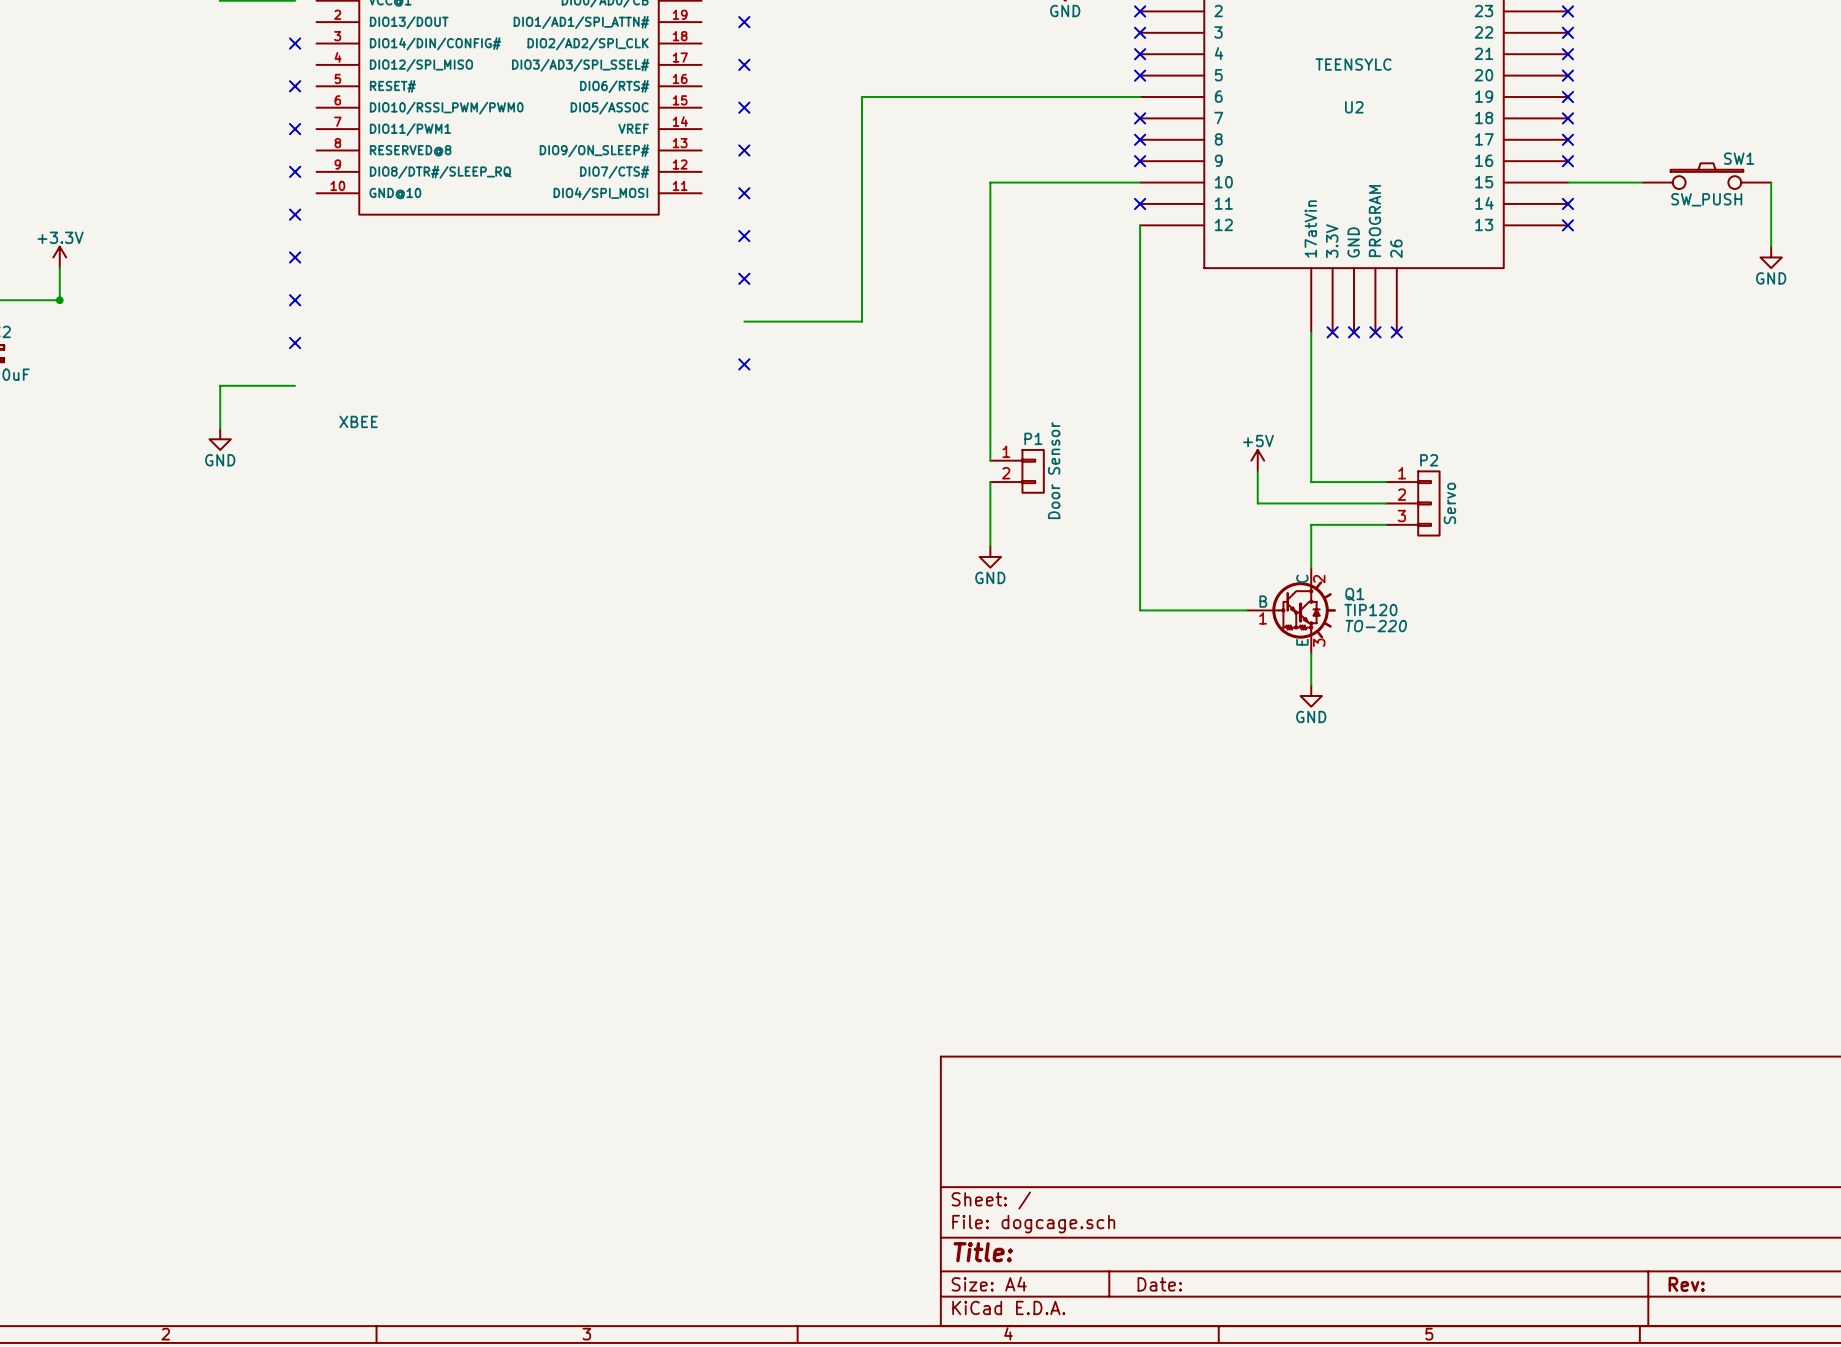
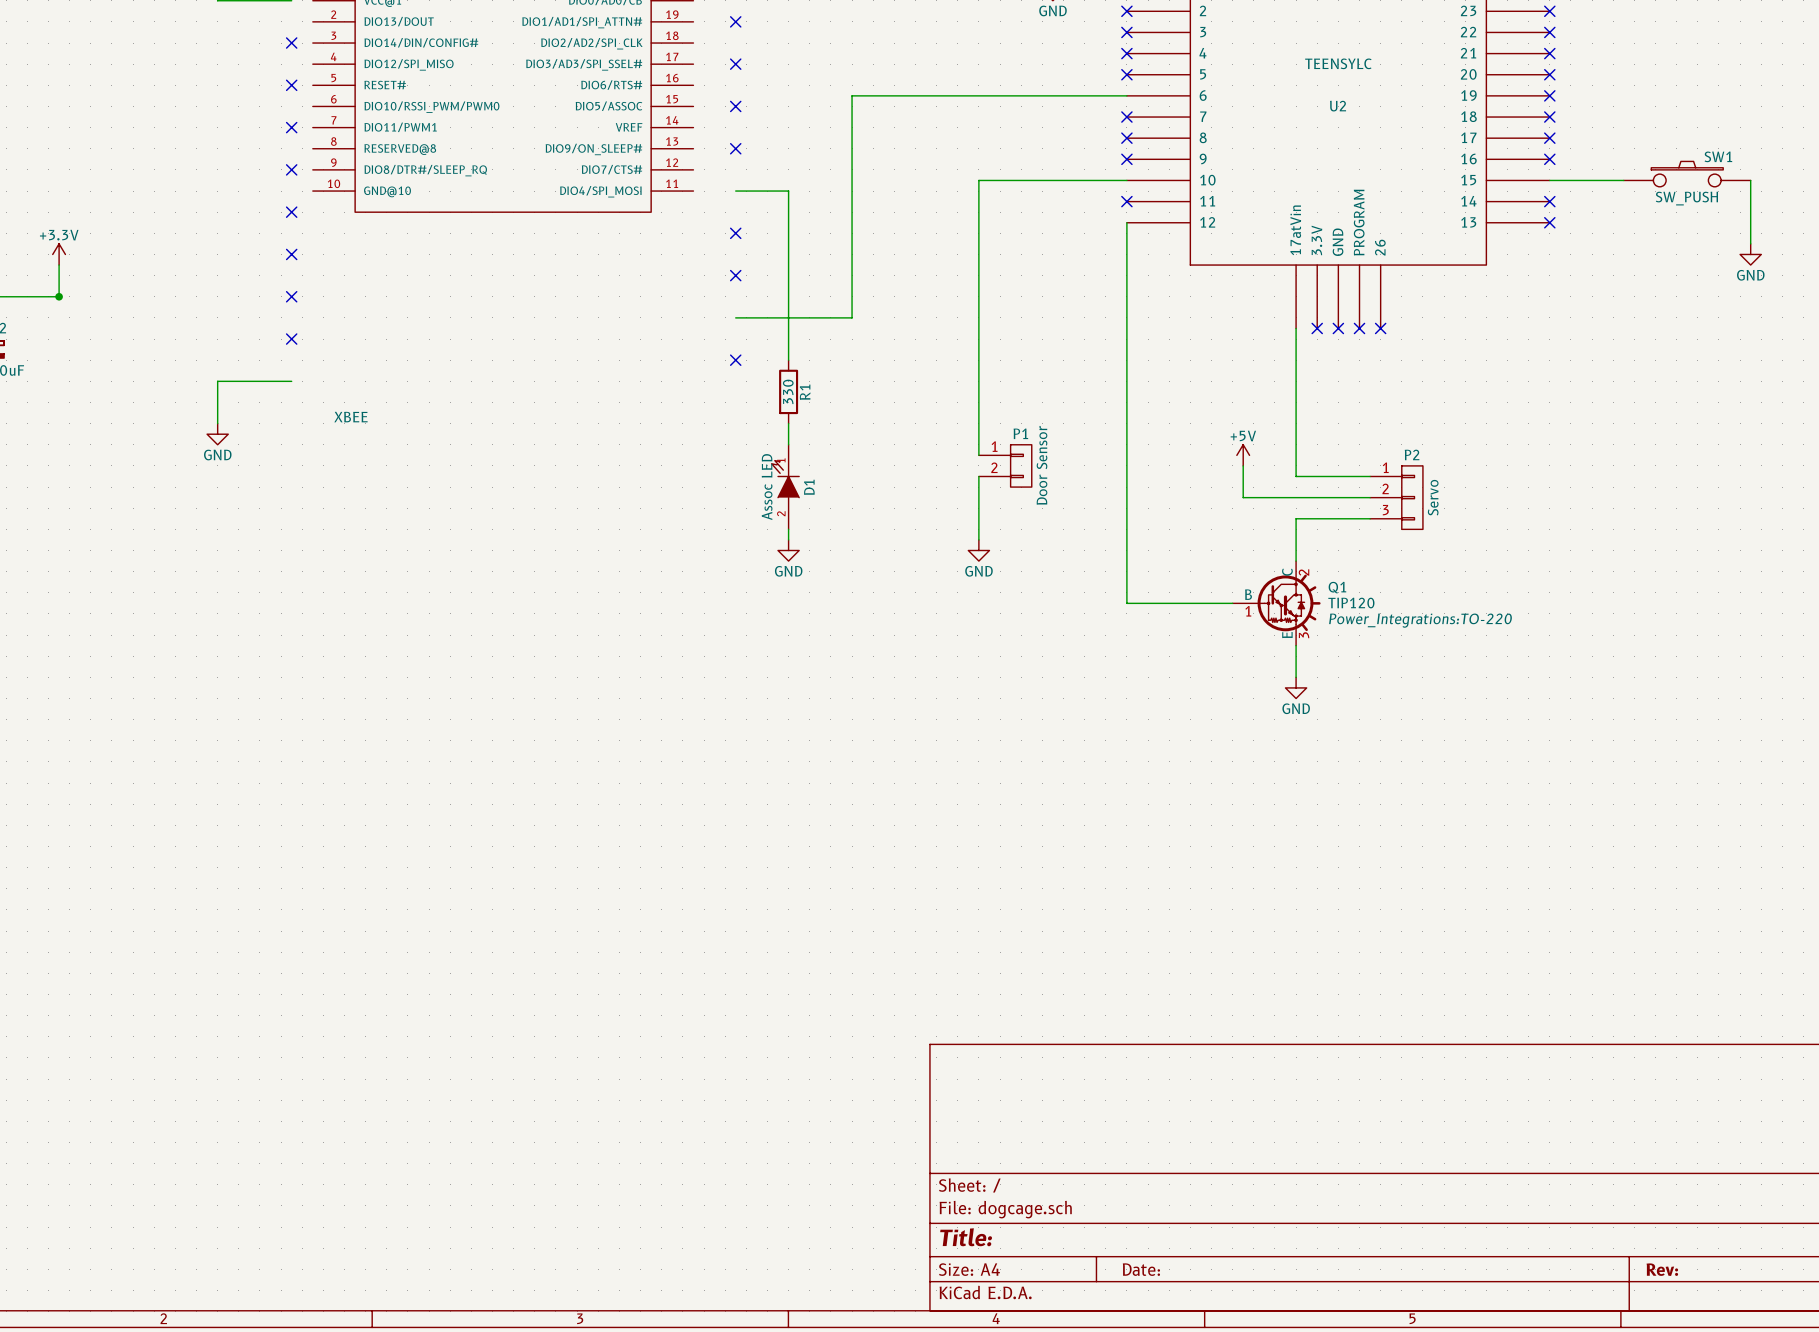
wire: none -> (735, 191) (788, 191) (788, 360)
no-connect mark: (744, 193) -> none
R1: none -> 330 (788, 391)
wire: none -> (788, 423) (788, 444)
D1: none -> Assoc LED (785, 487)
wire: none -> (788, 529) (788, 539)
power symbol: none -> GND (788, 550)
Q1 text: TO-220 (1376, 626) -> Power_Integrations:TO-220 (1420, 620)

